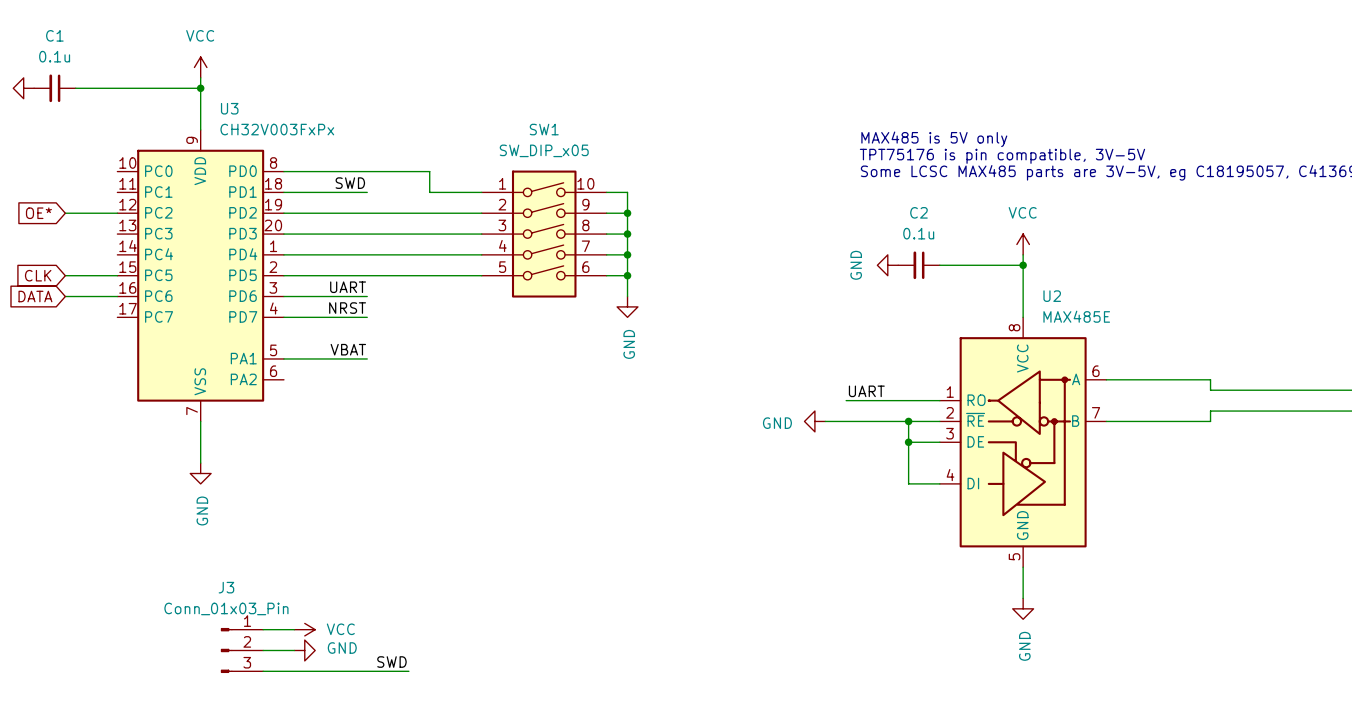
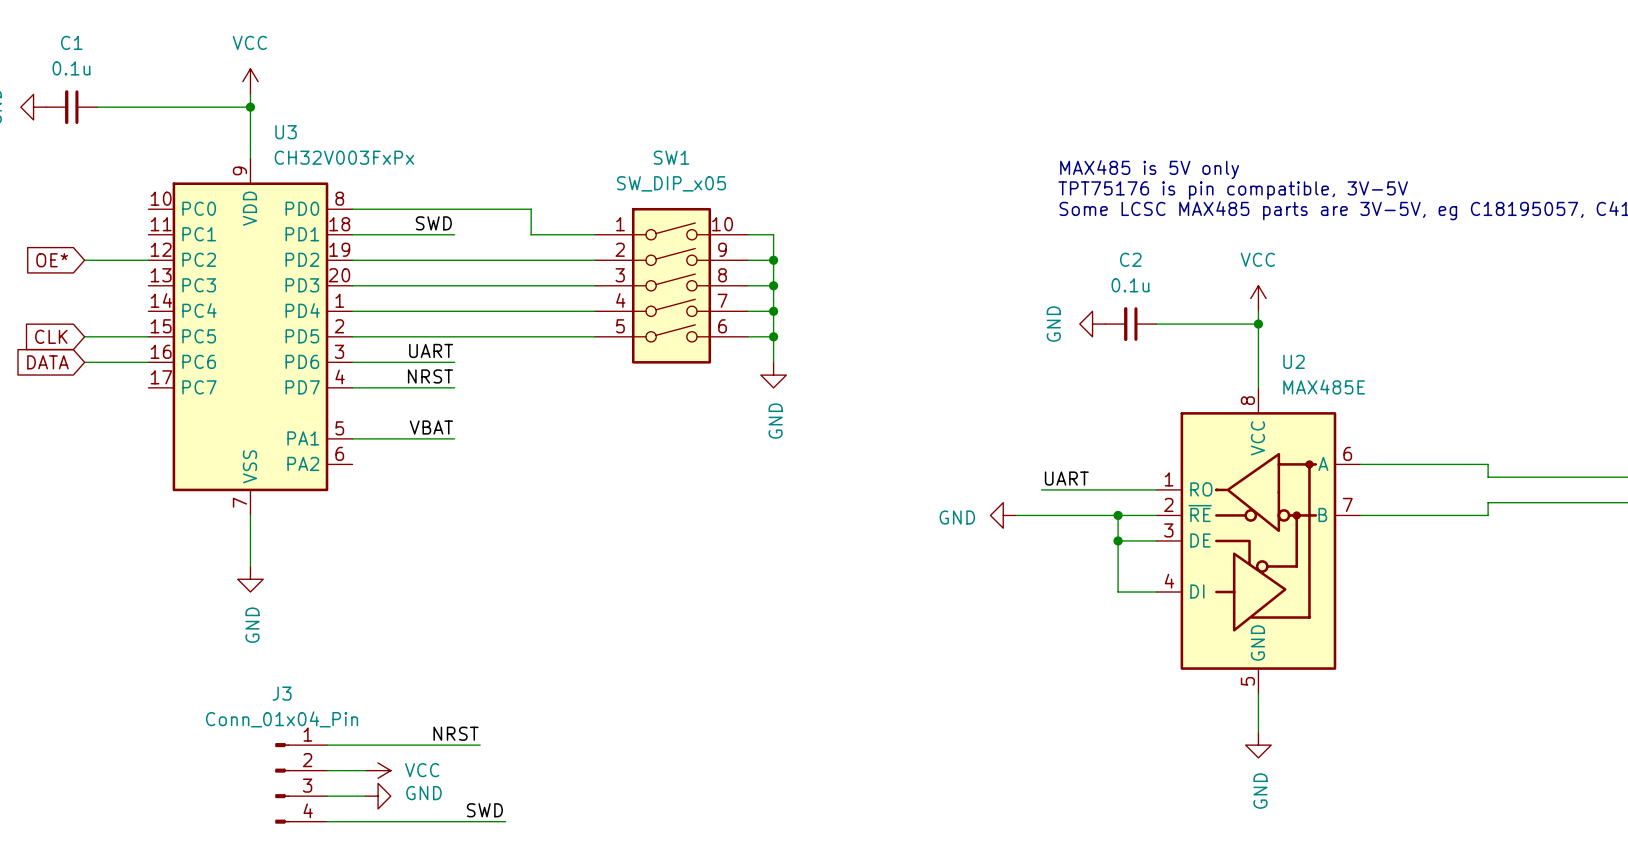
label: none -> NRST (456, 733)
J3 value: Conn_01x03_Pin (226, 608) -> Conn_01x04_Pin (282, 719)
wire: none -> (327, 745) (480, 745)
J3 symbol: [220, 628, 264, 673] -> [275, 743, 328, 824]

